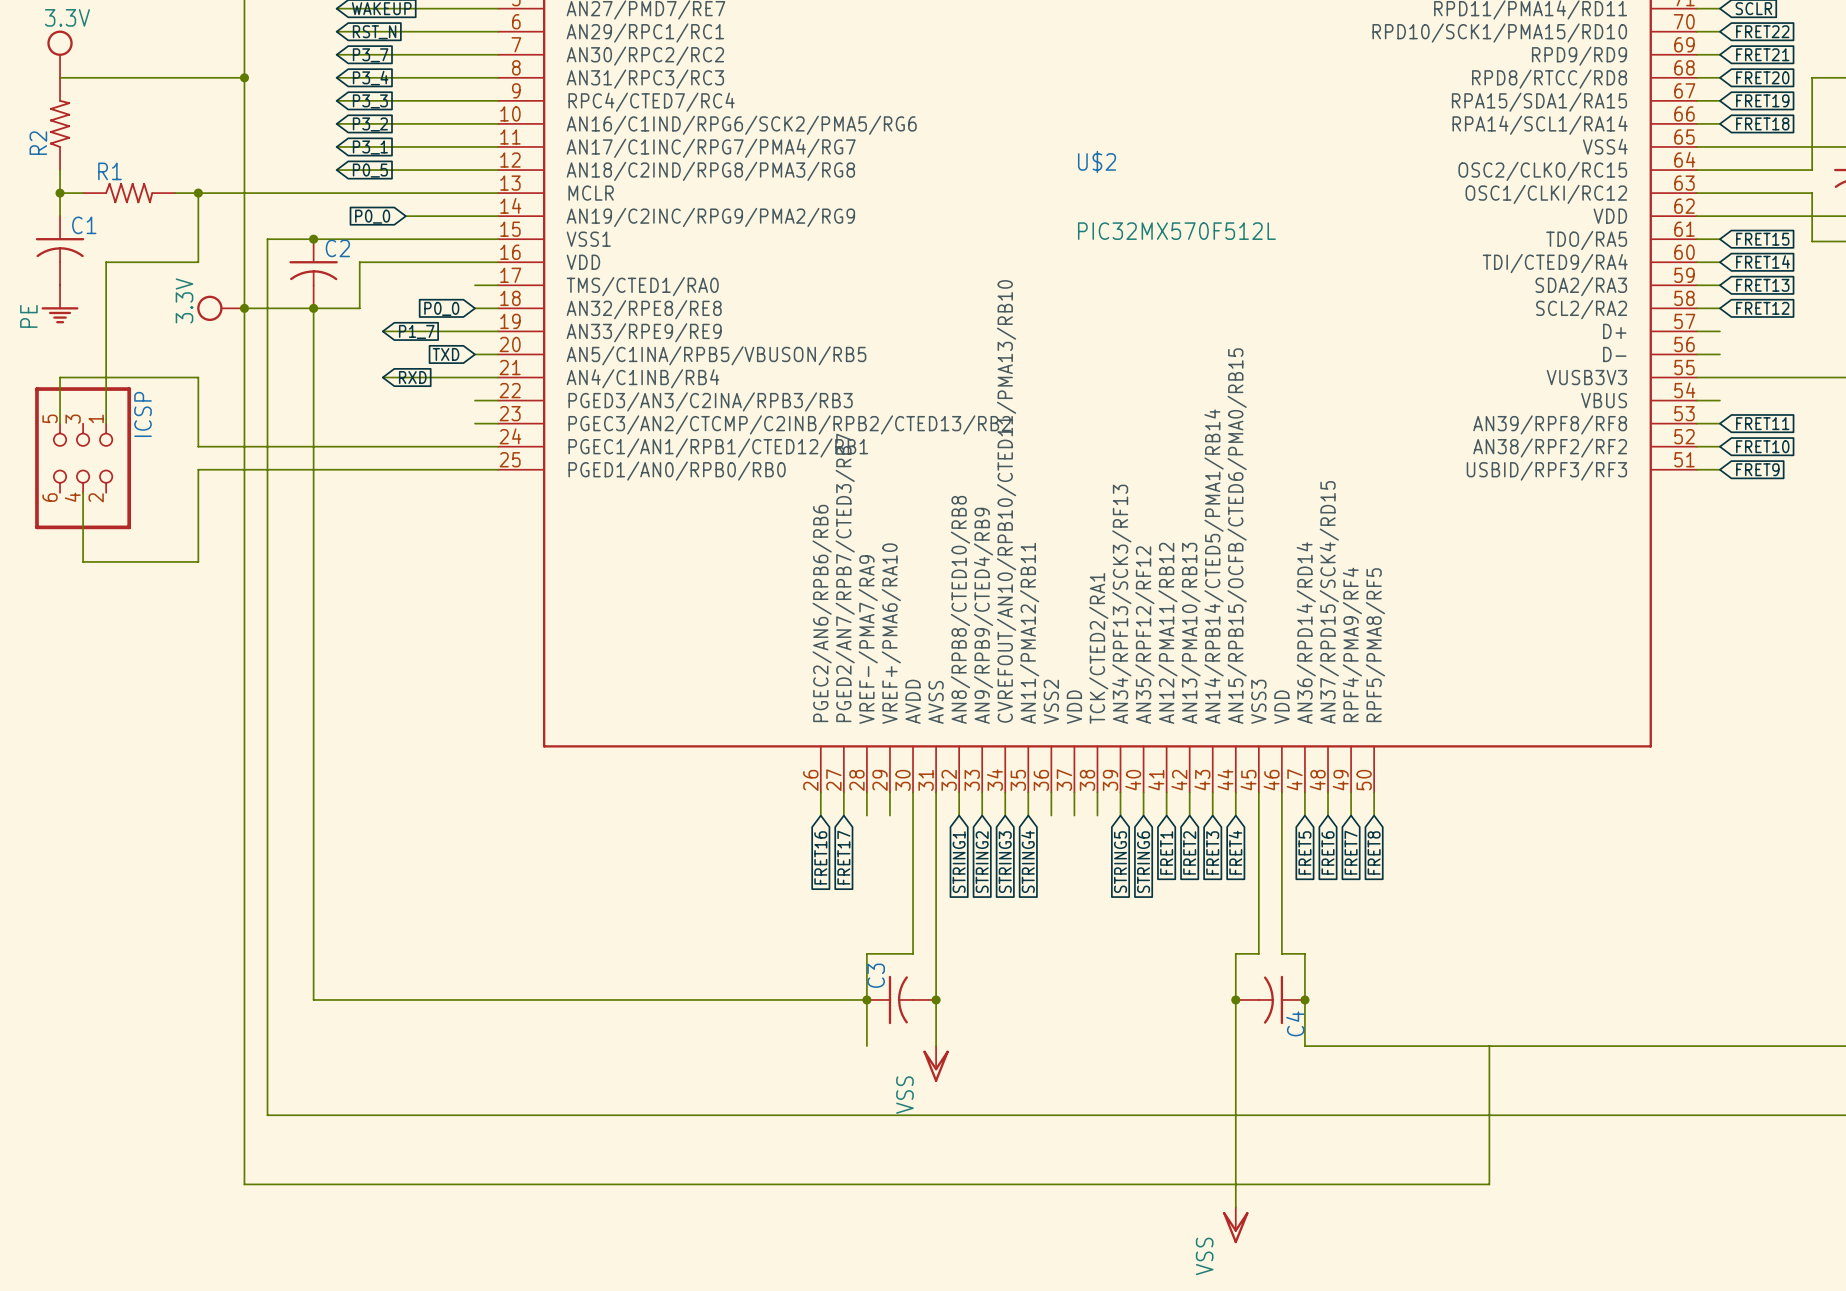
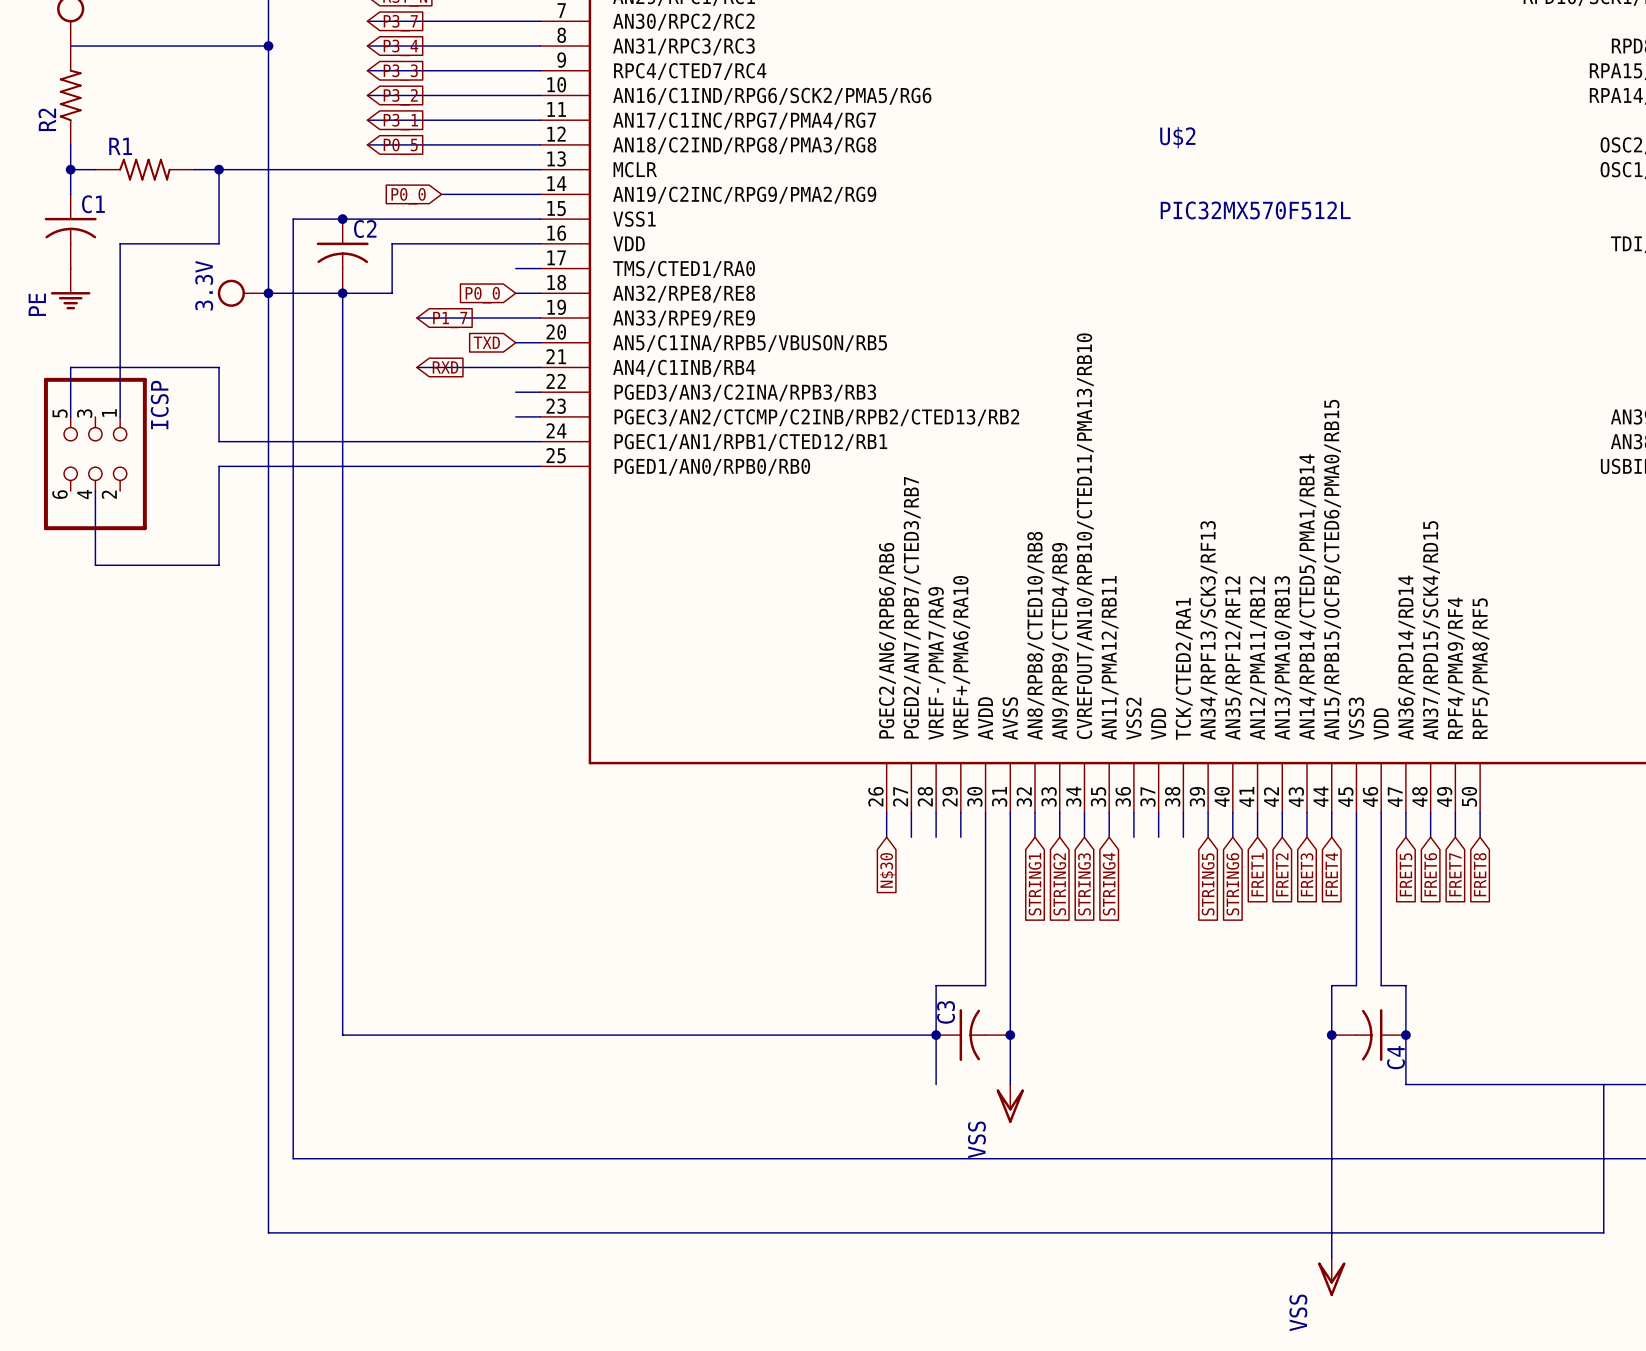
global label: FRET16 (820, 857) -> N$30 (887, 870)
global label: FRET17 (843, 857) -> none

